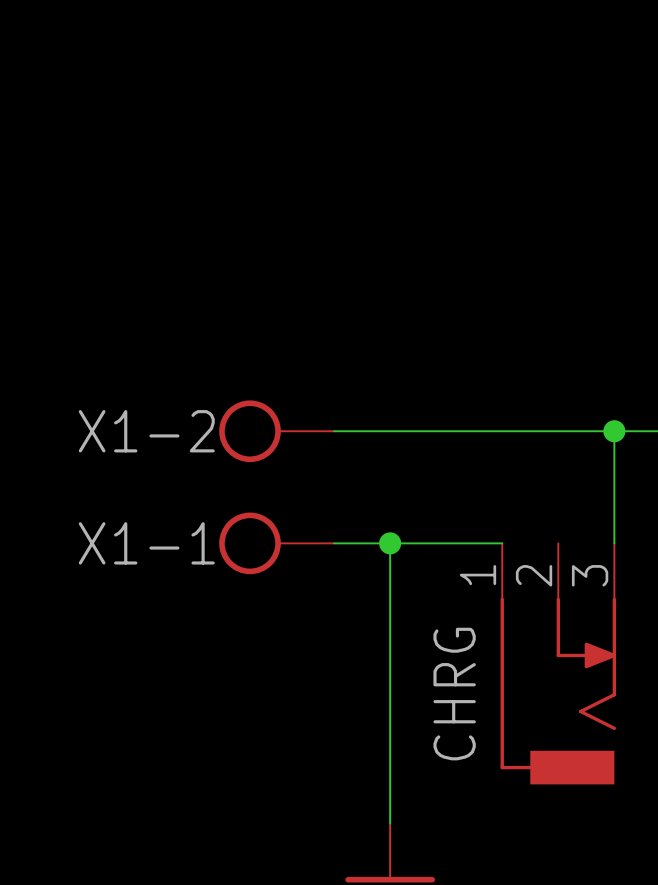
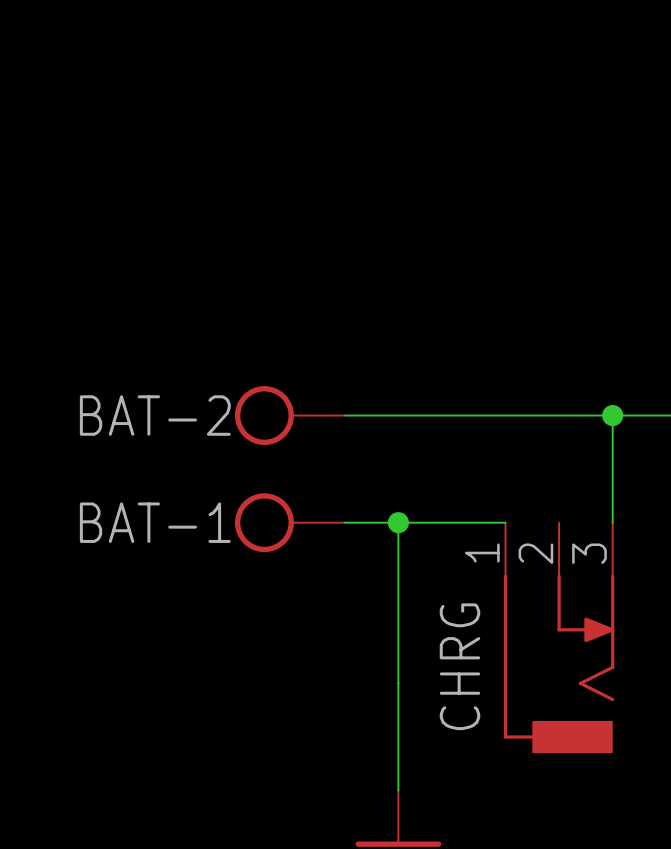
X1-2 name: X1-2 (146, 431) -> BAT-2 (155, 415)
X1-1 name: X1-1 (146, 543) -> BAT-1 (155, 522)

